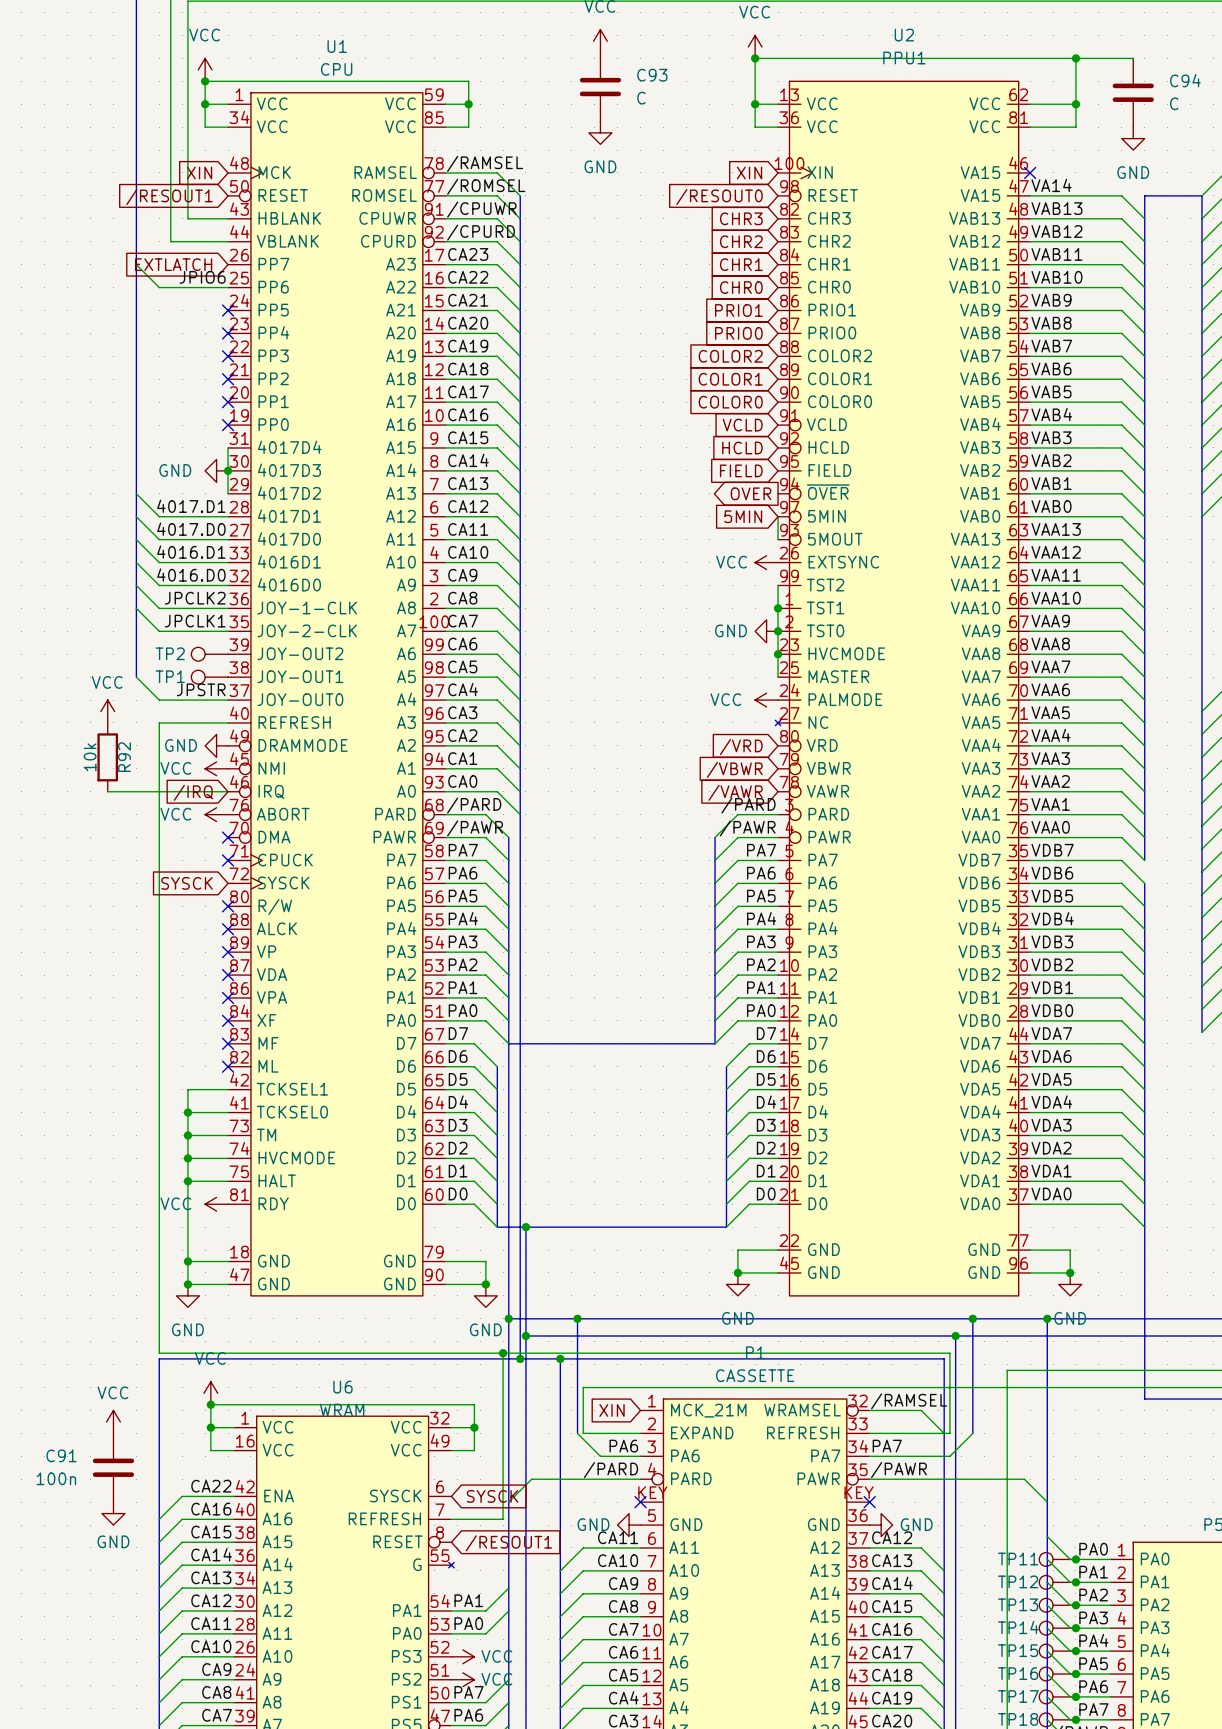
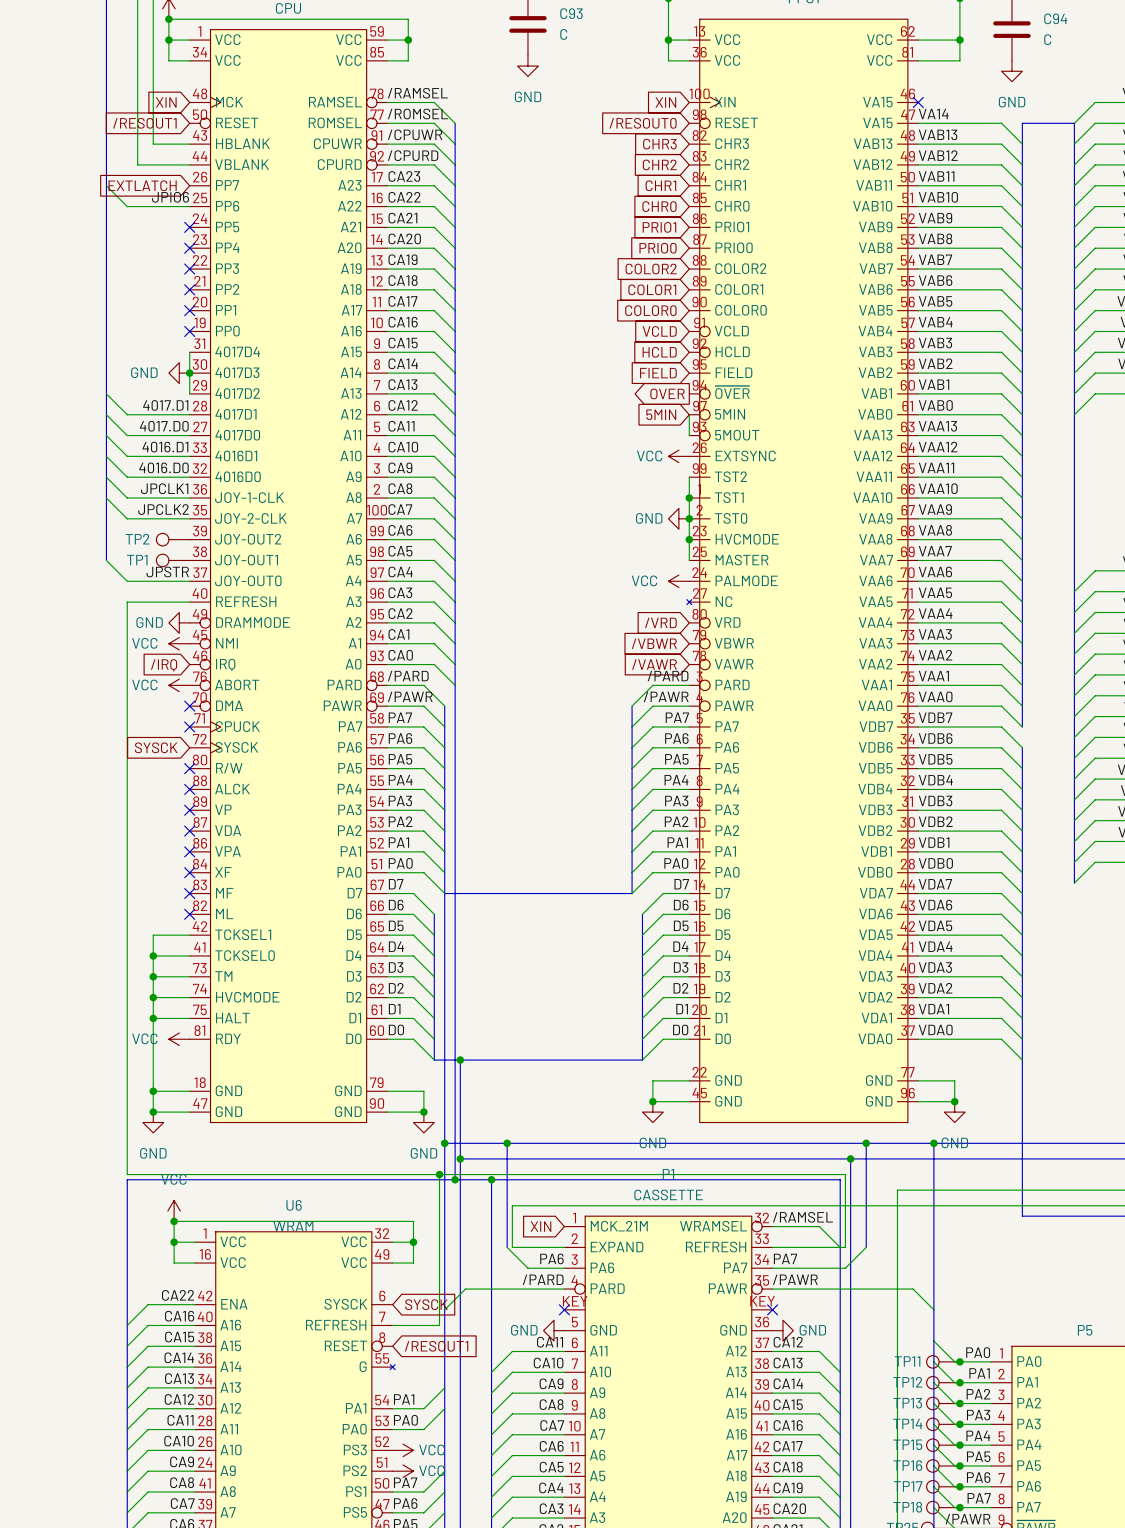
label: JPCLK2 (195, 598) -> JPCLK1 (164, 488)
label: JPCLK1 (195, 621) -> JPCLK2 (163, 509)
power symbol: VCC (107, 711) -> none
R92: 10k (107, 757) -> none
wire: (107, 791) (228, 791) -> none
power symbol: VCC (113, 1421) -> none
C91: 100n (113, 1467) -> none
power symbol: GND (113, 1513) -> none

